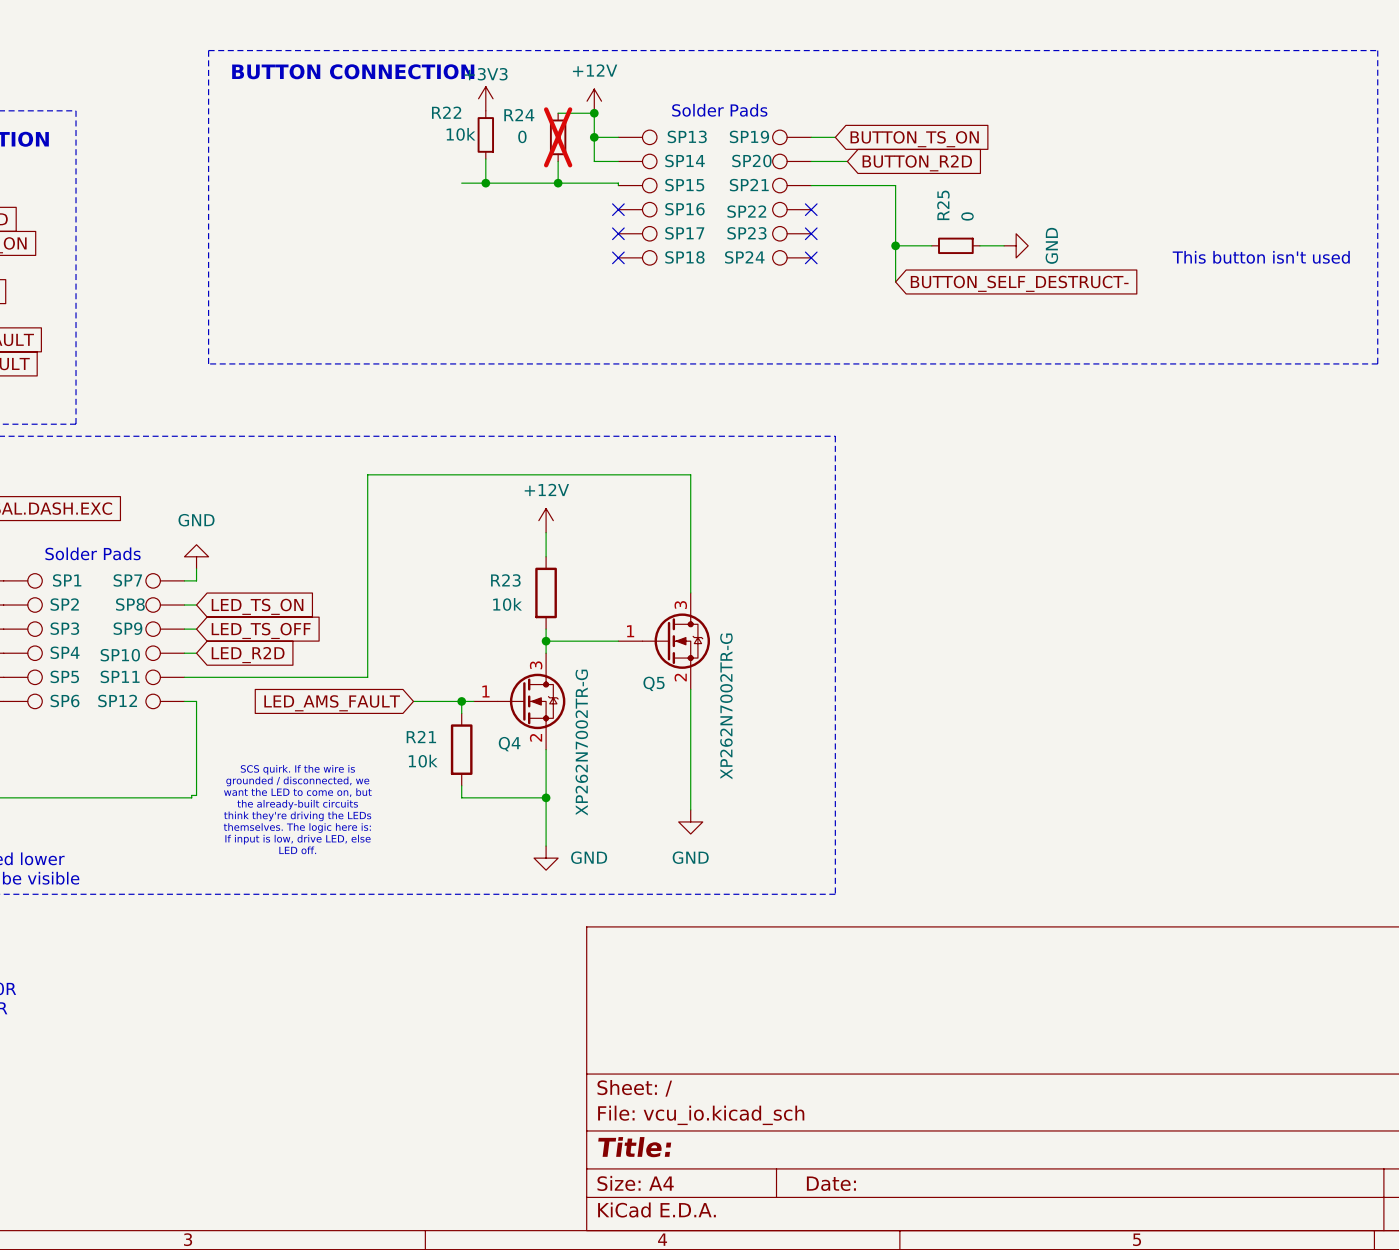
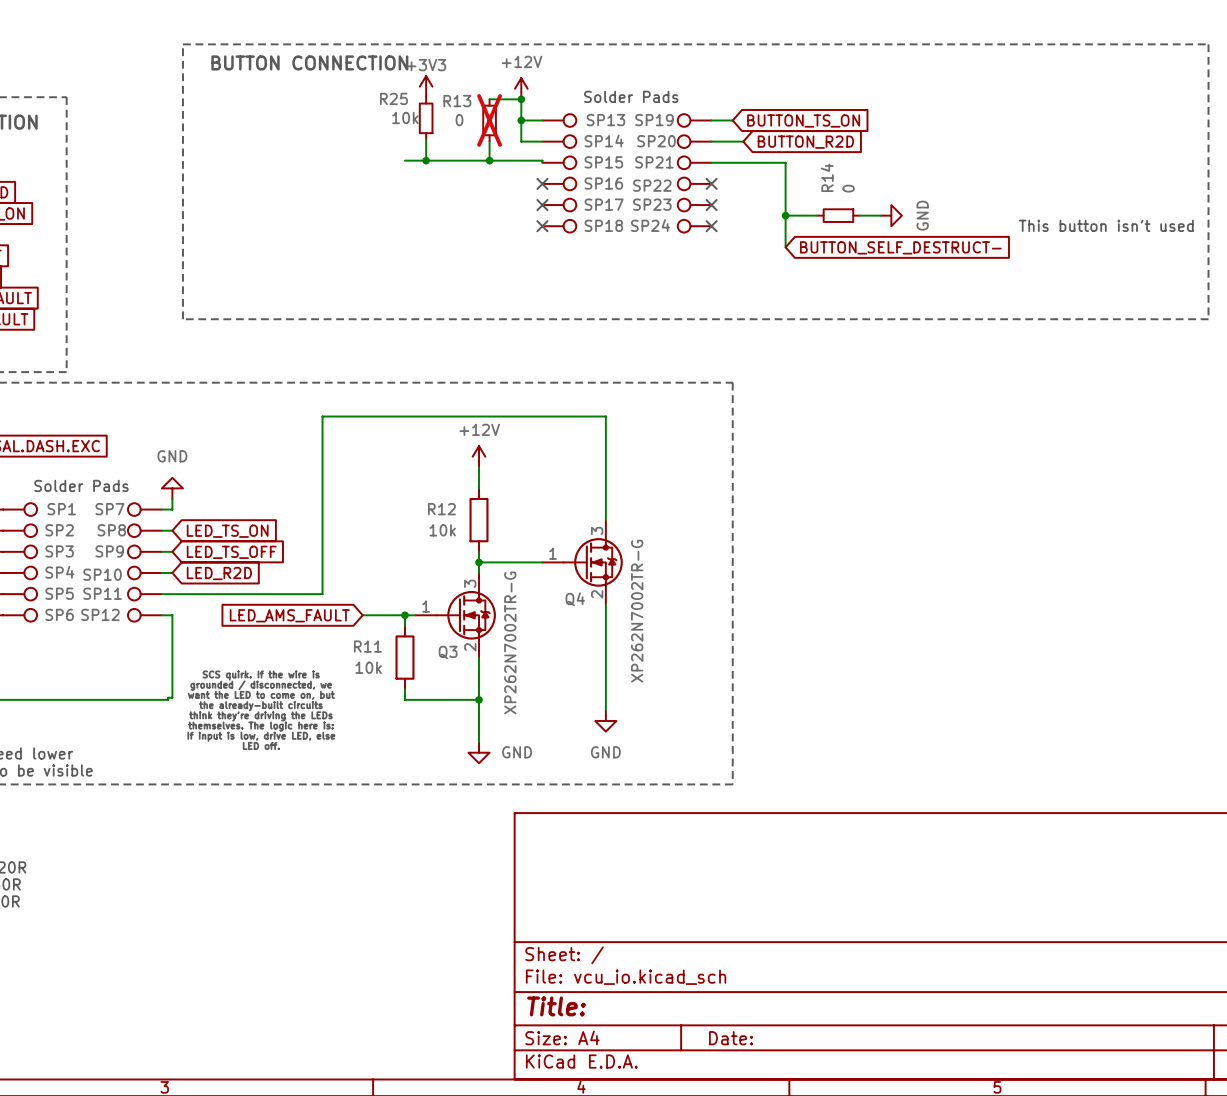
R22 name: R22 (446, 112) -> R25 (393, 98)
R24 name: R24 (519, 115) -> R13 (457, 101)
R25 name: R25 (943, 205) -> R14 (827, 177)
R23 name: R23 (505, 580) -> R12 (441, 509)
Q5 name: Q5 (654, 683) -> Q4 (575, 599)
R21 name: R21 (421, 737) -> R11 (367, 646)
Q4 name: Q4 (509, 744) -> Q3 (448, 652)

